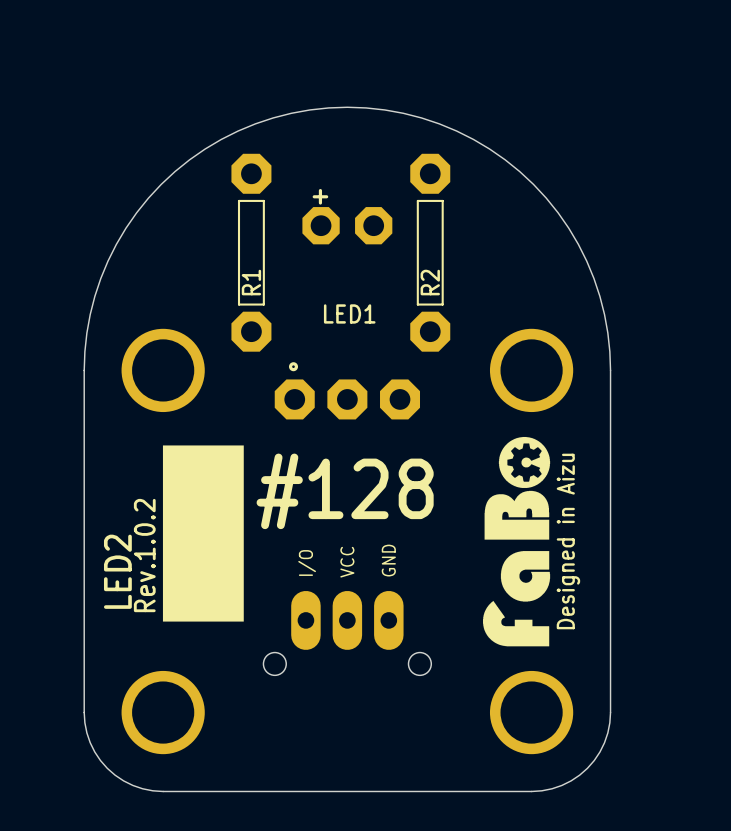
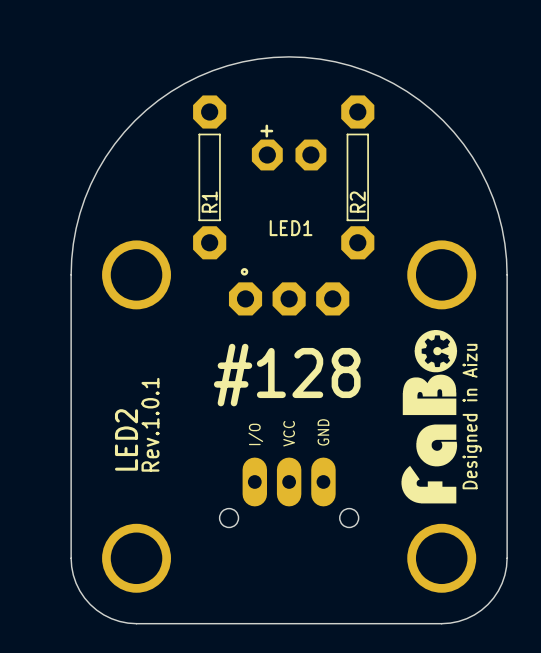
drawing: [162, 445, 244, 622] -> none
text: none -> Rev.1.0.1 (150, 424)
text: Rev.1.0.2 (144, 555) -> LED2 (126, 439)
text: LED2 (117, 571) -> none

